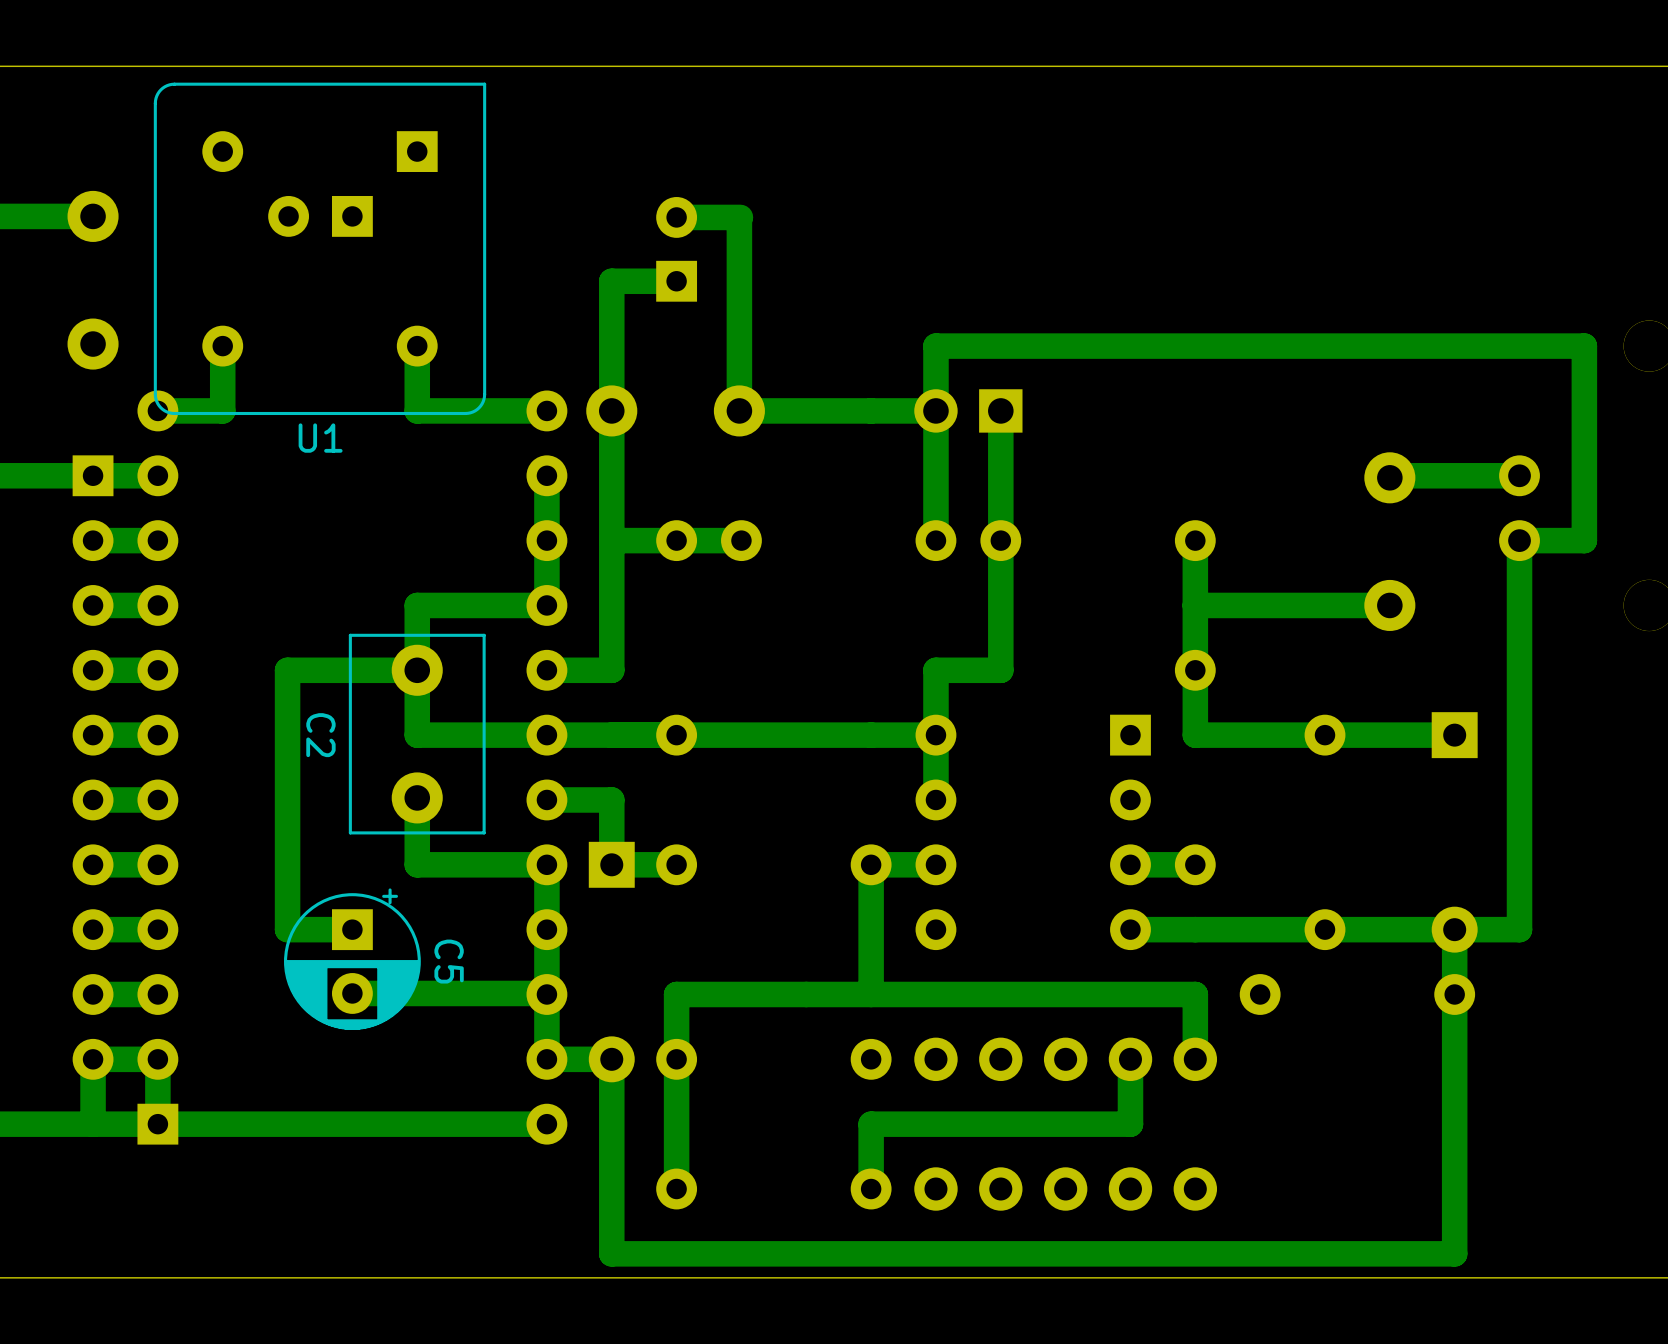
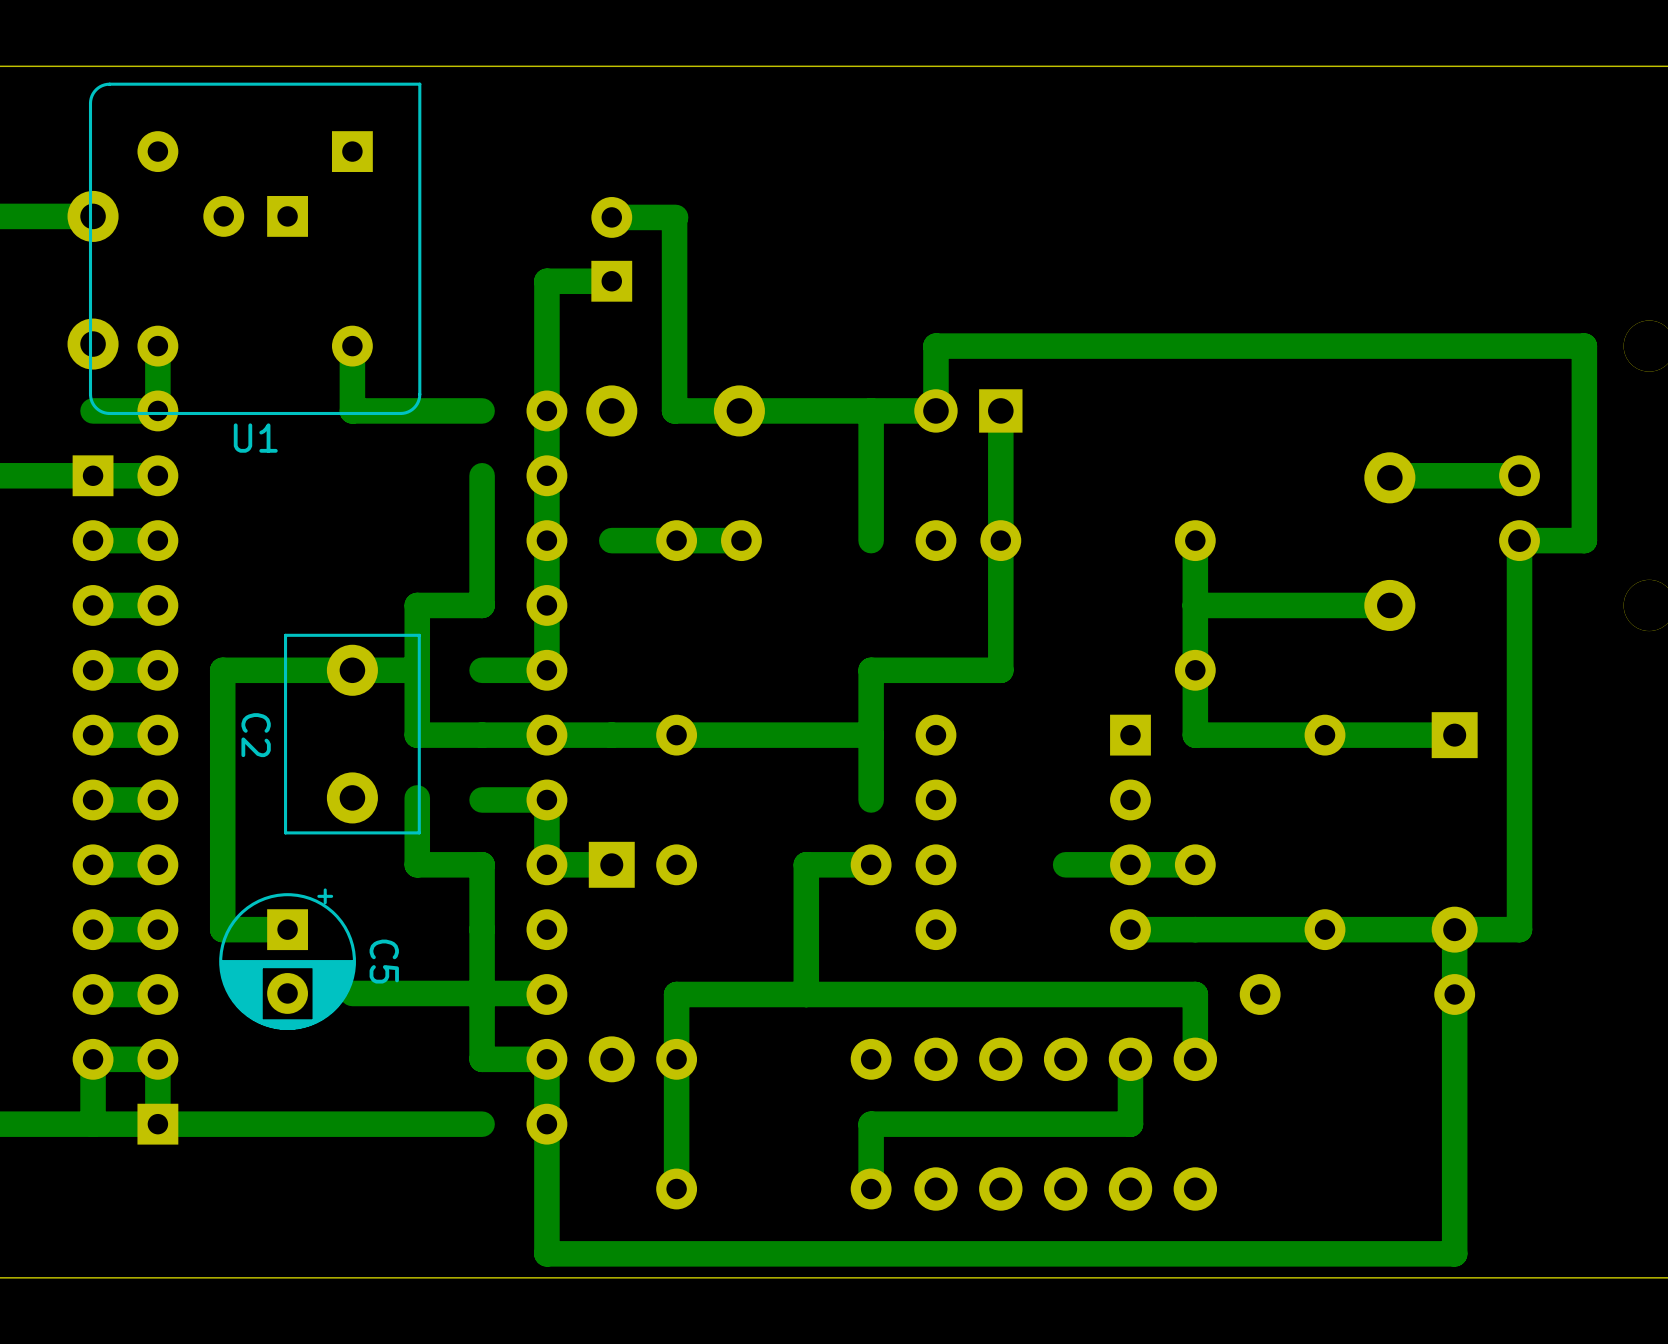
part position: (320, 216) -> (255, 216)
track: (740, 217) (676, 217) -> (611, 217) (675, 217)
track: (739, 218) (739, 410) -> (674, 218) (674, 410) (739, 410)
U1 position: (319, 248) -> (255, 248)
part position: (676, 249) -> (611, 249)
track: none -> (611, 281) (546, 281) (546, 475)
track: (676, 281) (611, 281) (611, 670) (546, 670) -> none
track: (222, 346) (222, 410) (157, 410) -> (157, 346) (157, 410) (93, 410)
track: (417, 346) (417, 410) -> (352, 346) (352, 410) (417, 410)
track: (546, 410) (482, 410) -> none
track: (935, 410) (935, 540) -> (871, 410) (871, 540)
track: none -> (482, 475) (482, 605)
track: (546, 605) (482, 605) -> (546, 605) (546, 670) (482, 670)
track: (287, 670) (287, 929) (352, 929) -> (287, 670) (222, 670) (222, 929) (287, 929)
track: (935, 670) (935, 799) -> (935, 670) (871, 670) (871, 799)
C2 position: (417, 734) -> (352, 734)
track: (935, 735) (871, 735) -> (1130, 864) (1065, 864)
track: (546, 799) (611, 799) (611, 864) (676, 864) -> (482, 799) (546, 799) (546, 864) (611, 864)
track: (482, 864) (546, 864) (546, 1059) (611, 1059) (611, 1253) -> (482, 864) (482, 1059) (546, 1059) (546, 1253) (611, 1253)
track: (935, 864) (871, 864) (871, 994) -> (871, 864) (806, 864) (806, 994)
C5 position: (352, 959) -> (287, 959)
track: (546, 1124) (482, 1124) -> none

